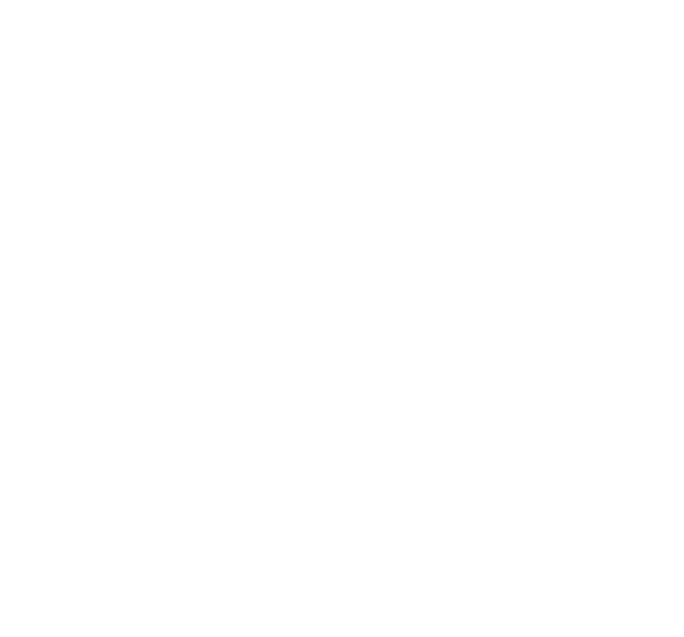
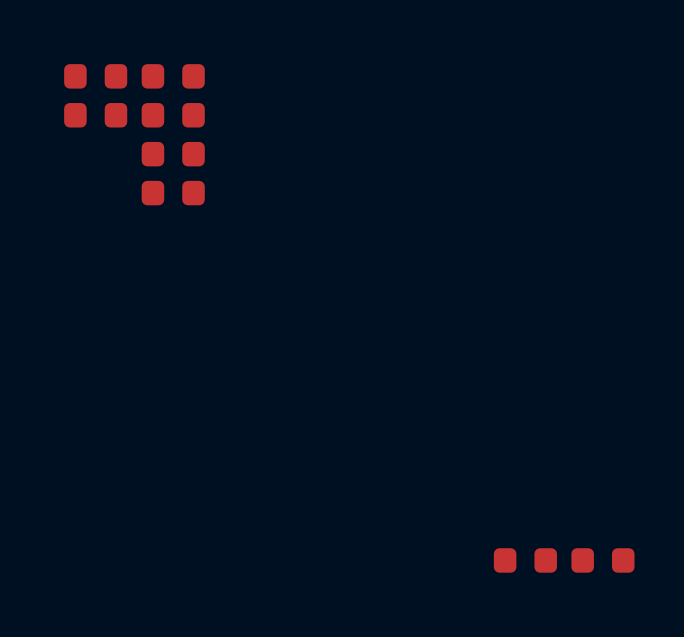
part: none -> (95, 76)
part: none -> (173, 76)
part: none -> (95, 115)
part: none -> (173, 115)
part: none -> (173, 154)
part: none -> (173, 193)
part: none -> (525, 560)
part: none -> (602, 560)

